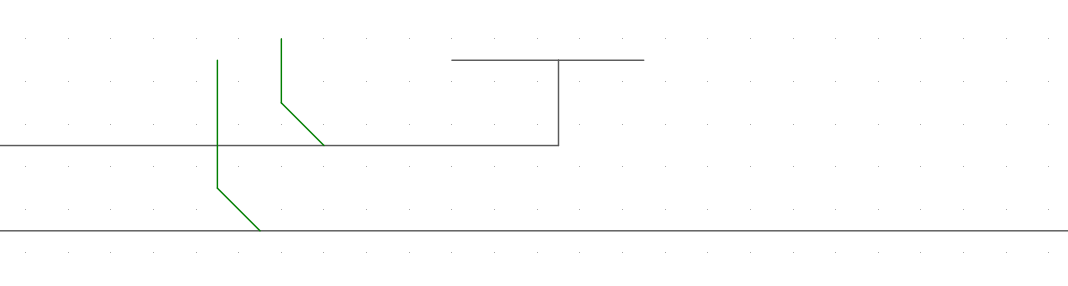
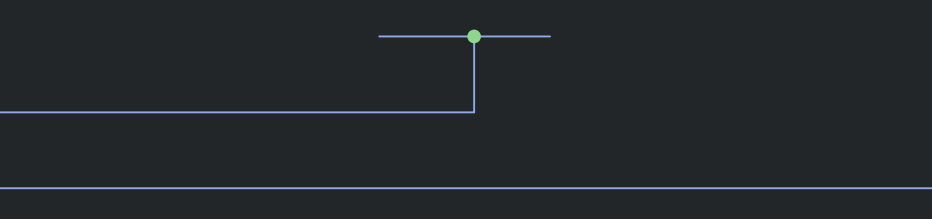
wire: (281, 38) (281, 102) (323, 145) -> none
wire: (217, 60) (217, 188) (260, 230) -> none
junction: none -> (474, 36)

